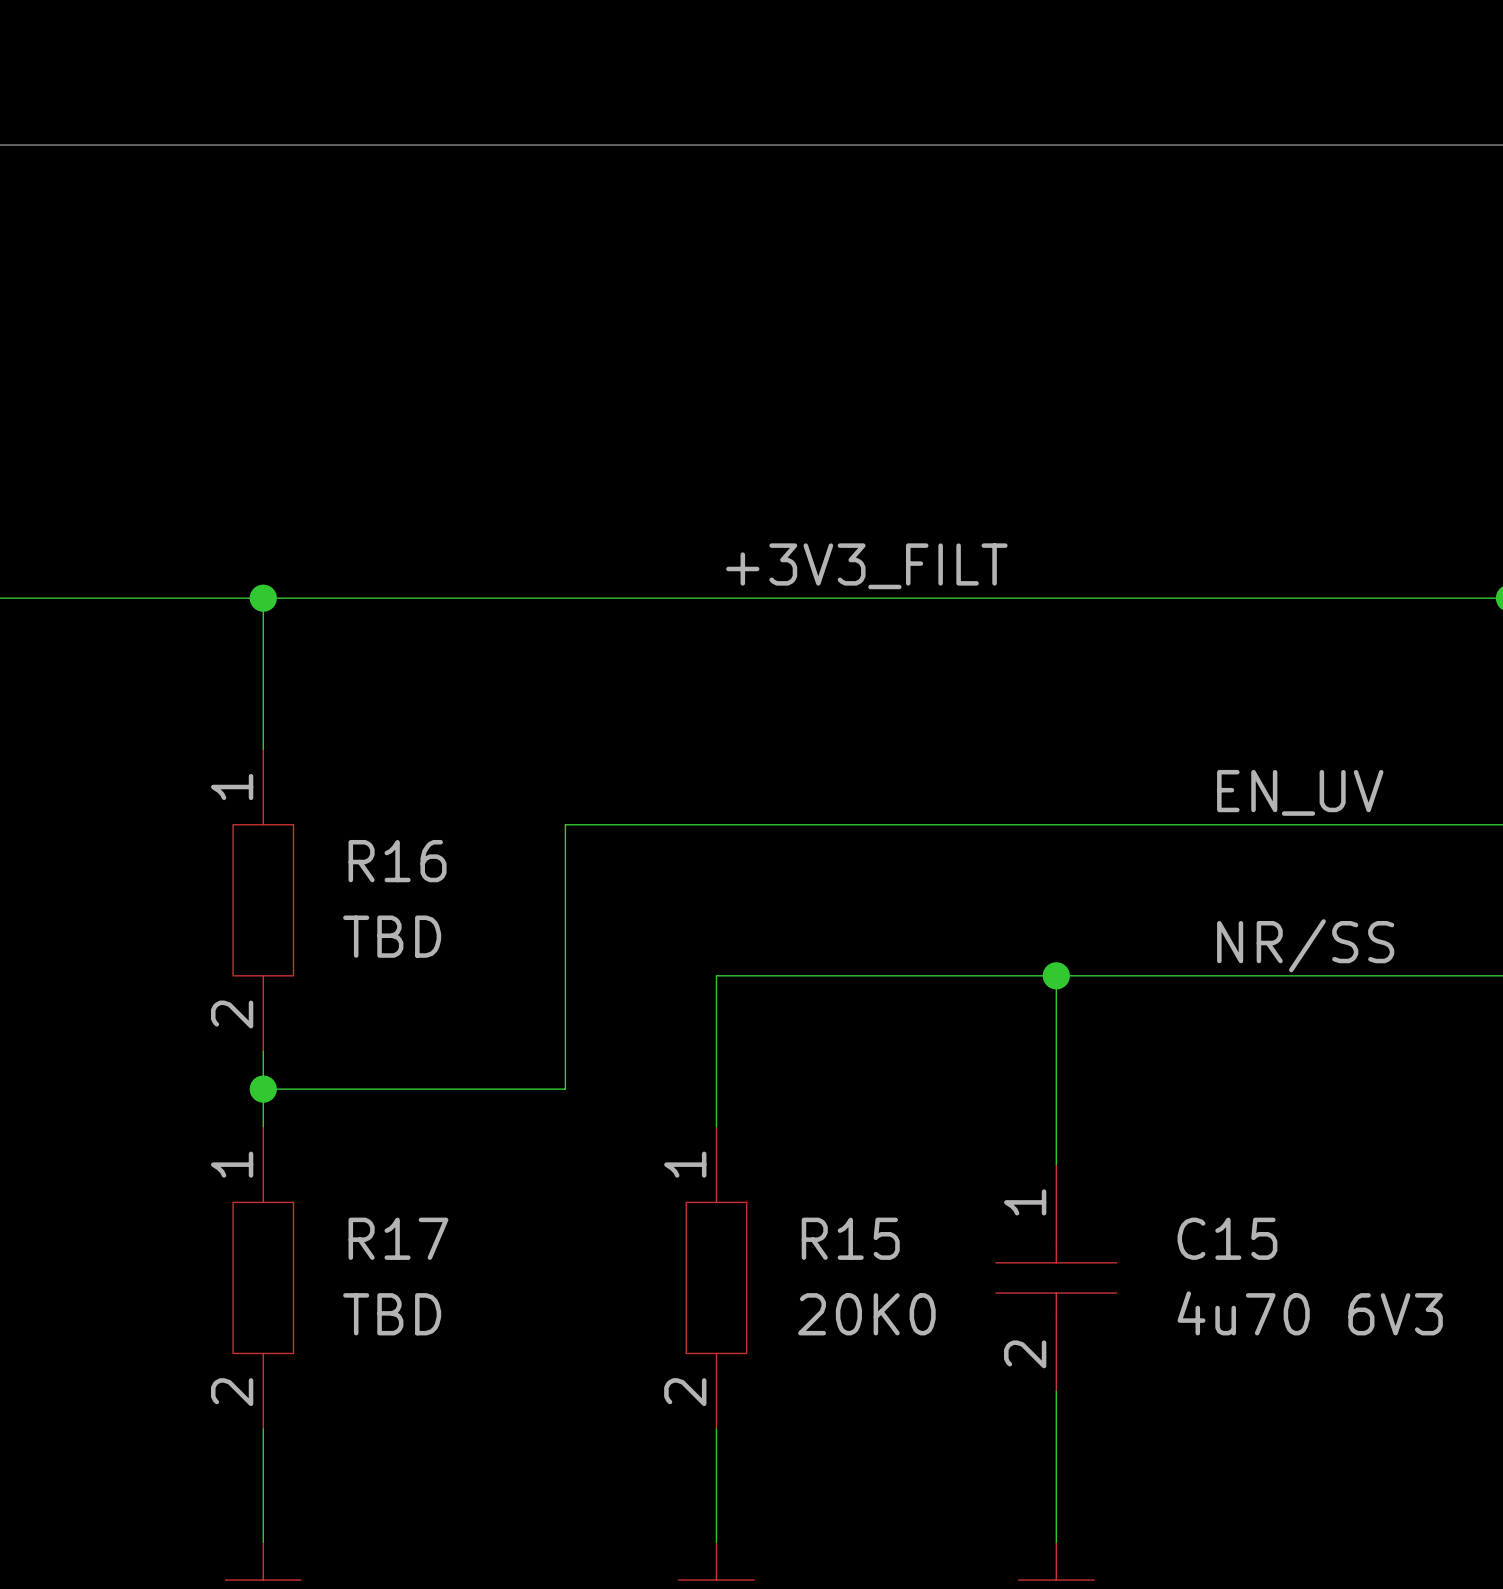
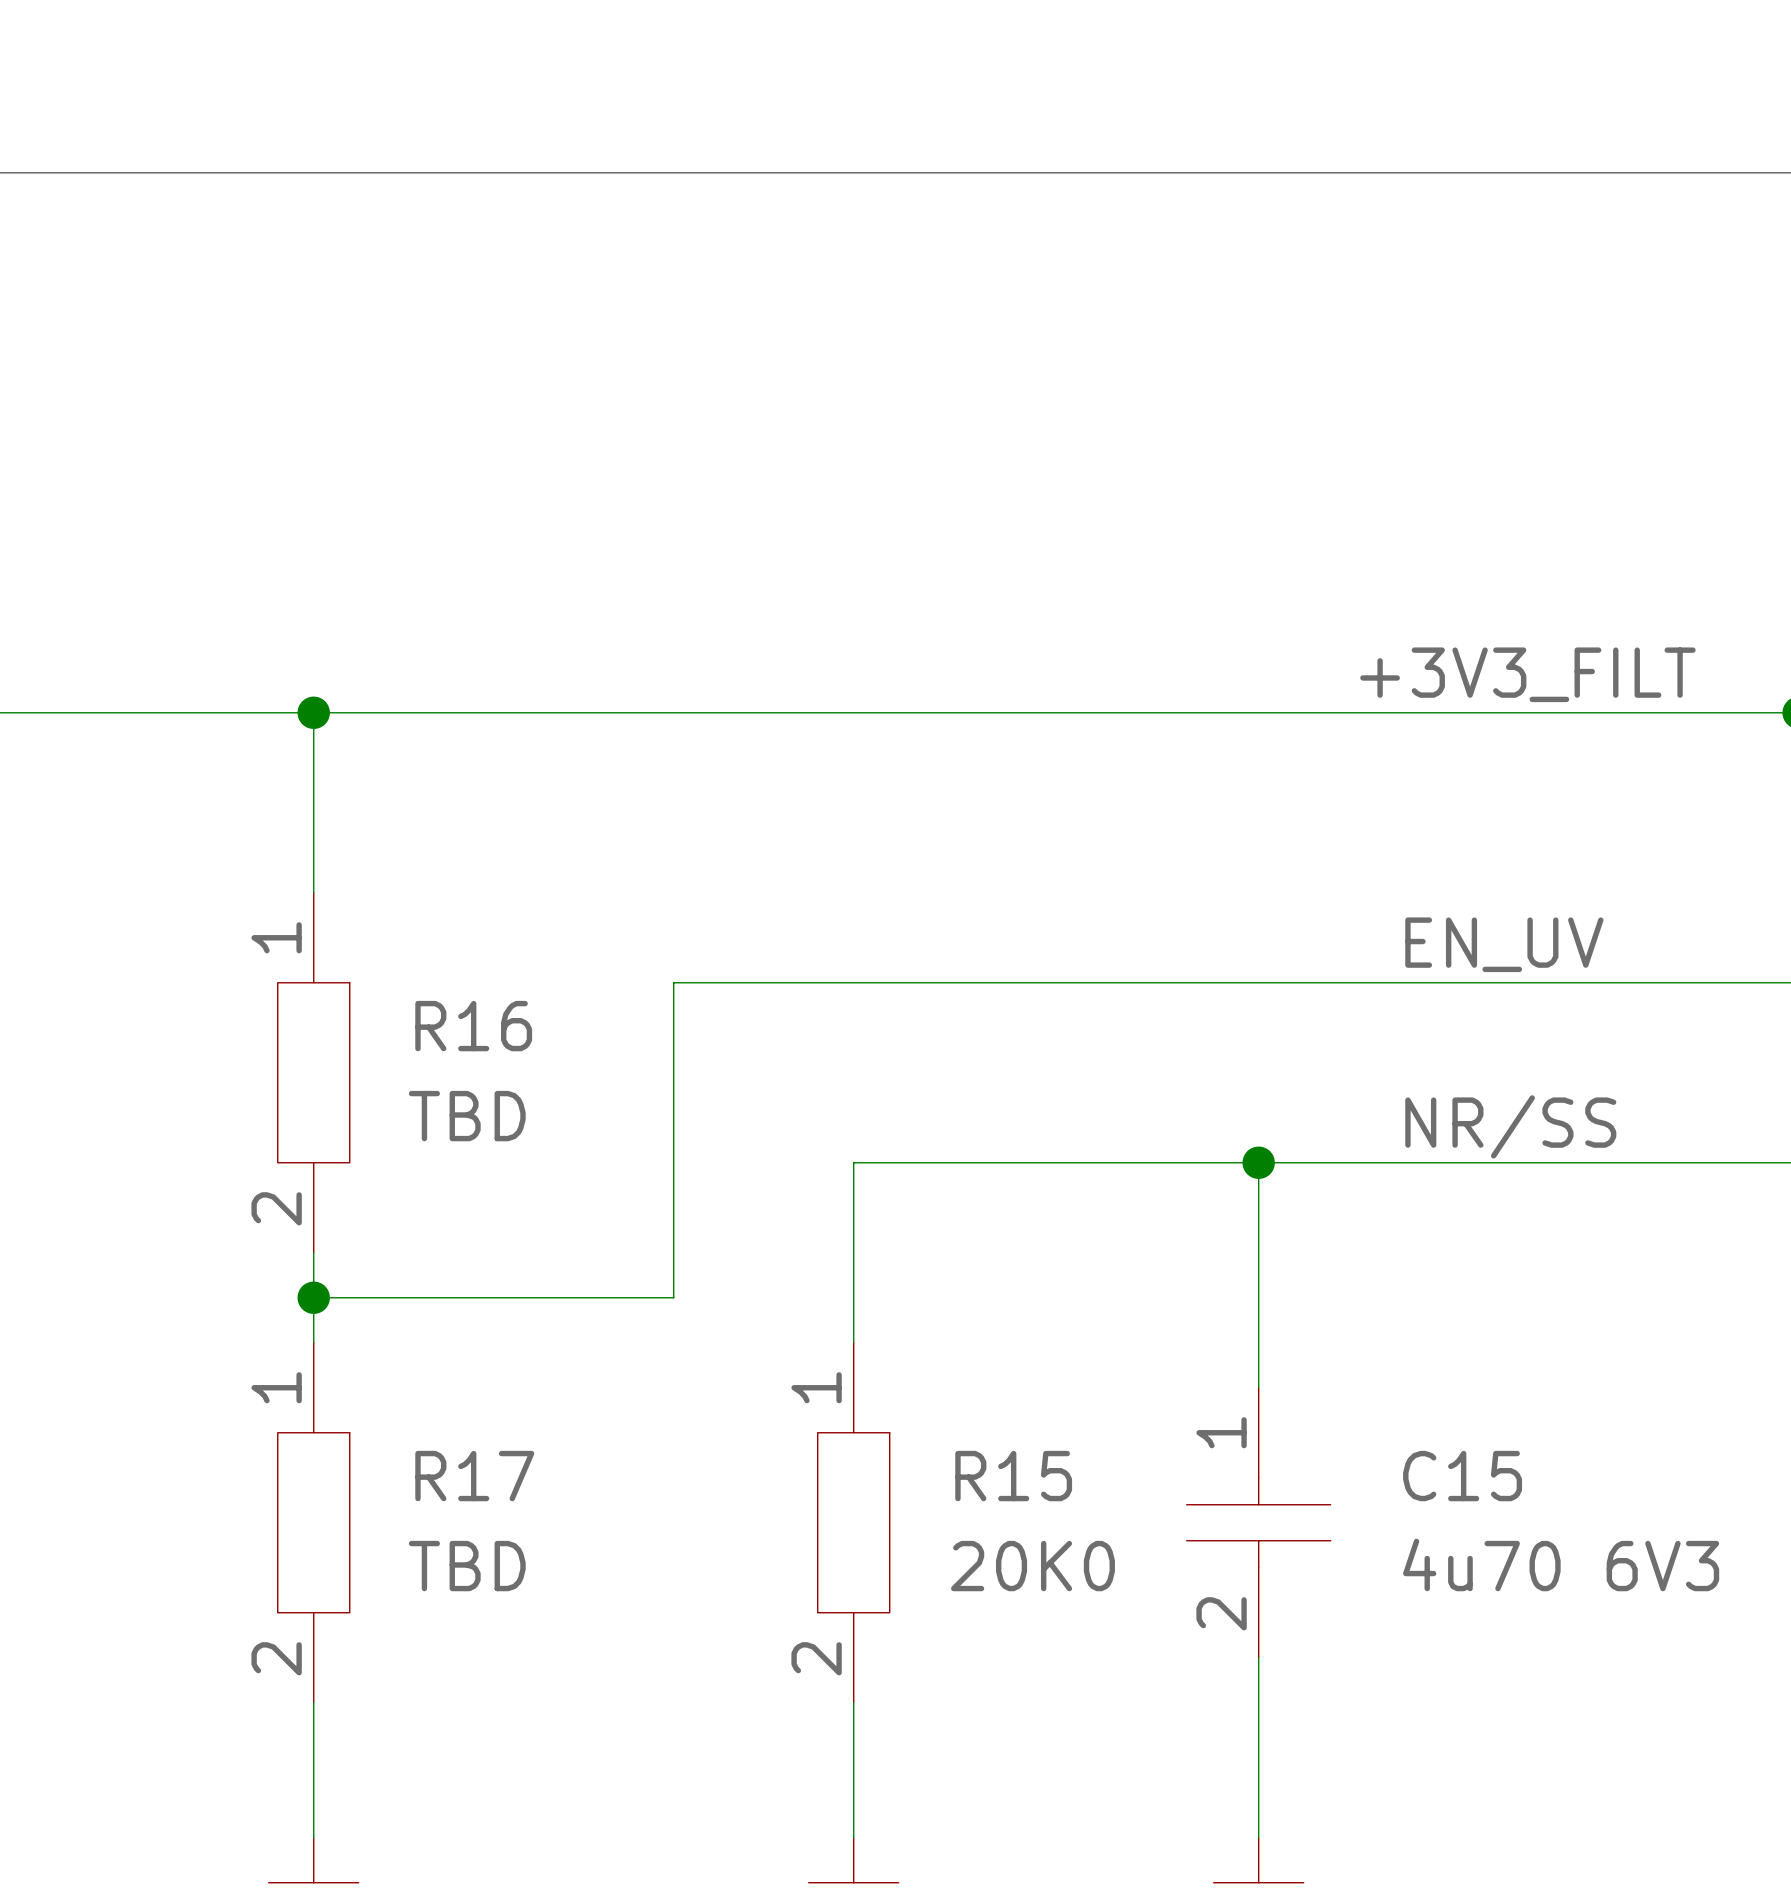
label position: +3V3_FILT (866, 566) -> +3V3_FILT (1527, 674)
label position: EN_UV (1300, 792) -> EN_UV (1504, 944)
label position: NR/SS (1305, 945) -> NR/SS (1510, 1126)

